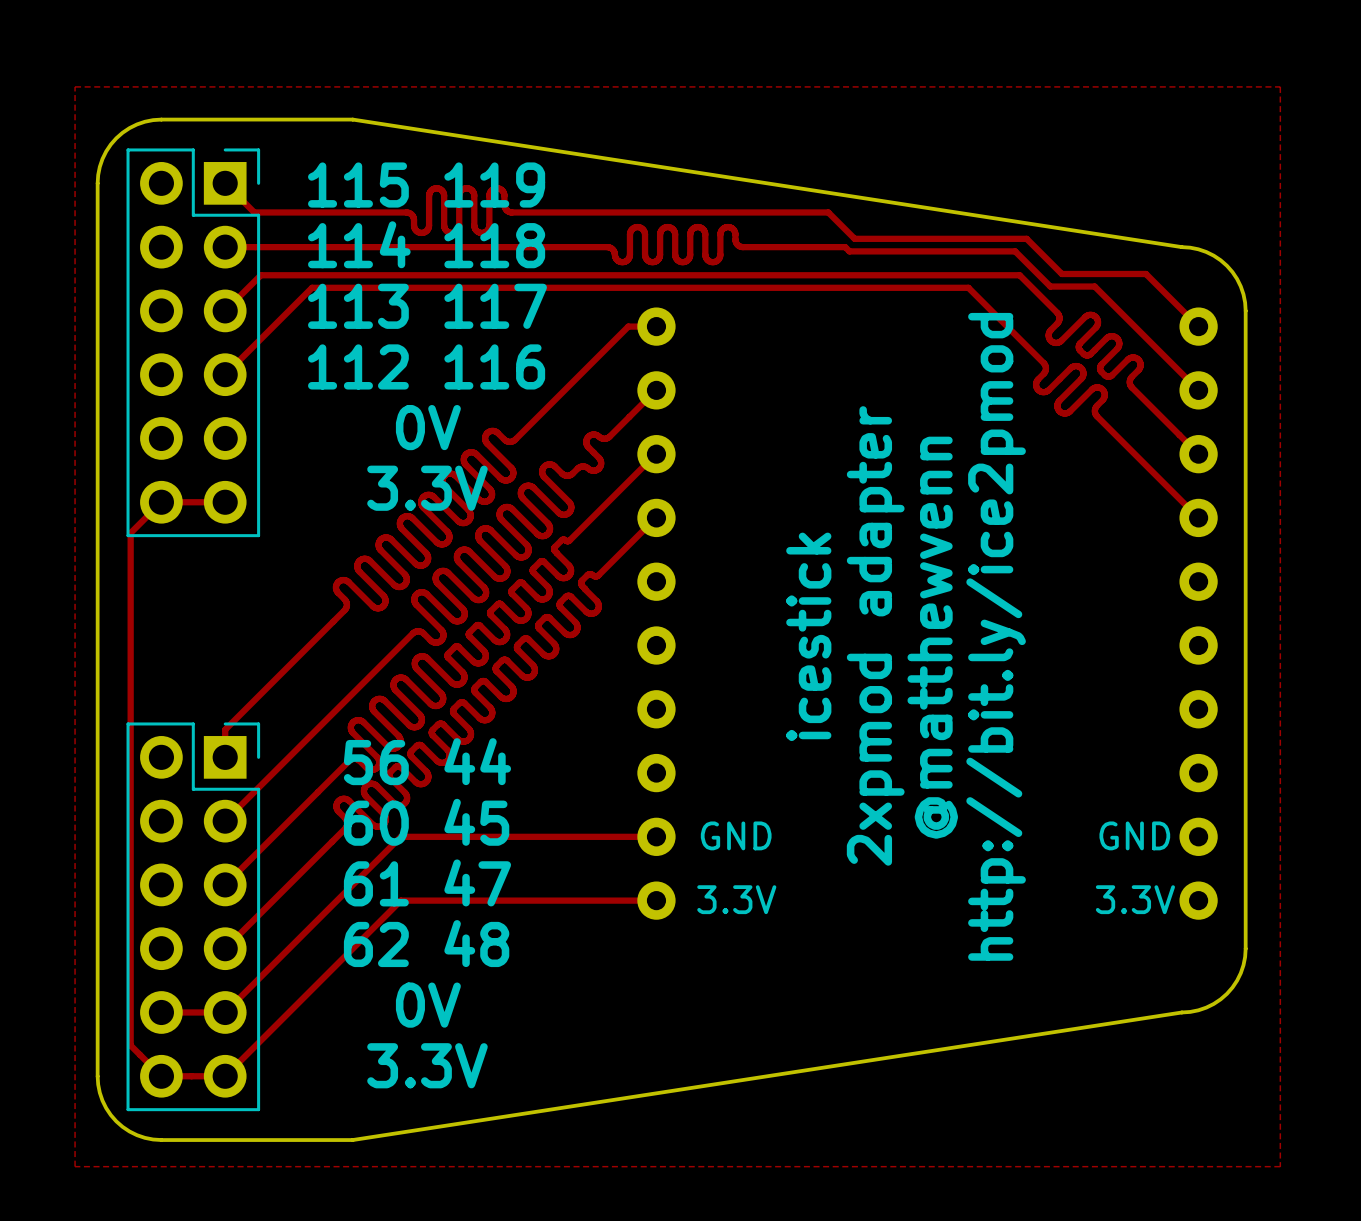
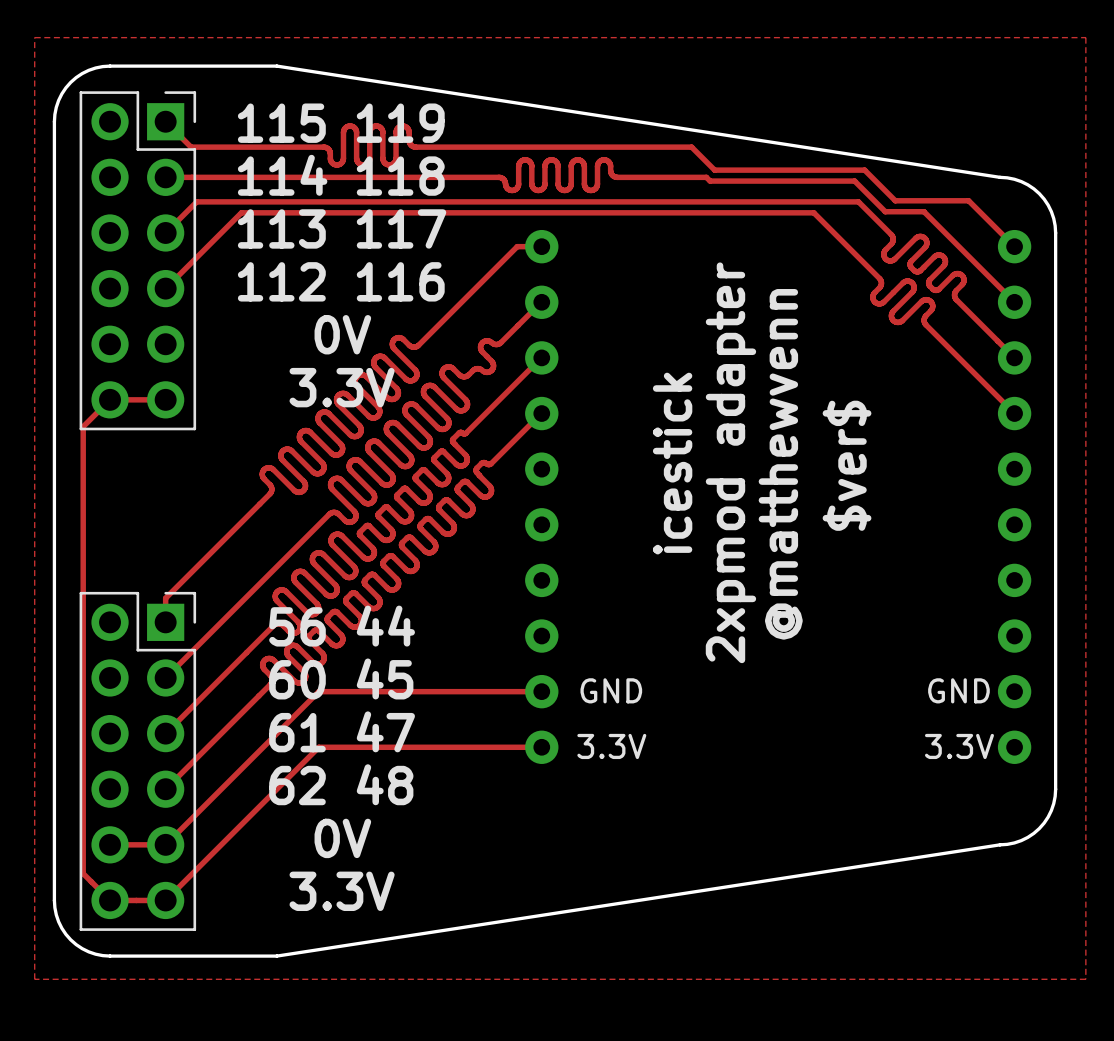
text: none -> $ver$ (847, 465)
text position: 2xpmod adapter (875, 635) -> 2xpmod adapter (730, 462)
text position: icestick (808, 636) -> icestick (672, 463)
text: http://bit.ly/ice2pmod (996, 636) -> none
text position: @matthewvenn (932, 637) -> @matthewvenn (780, 464)

